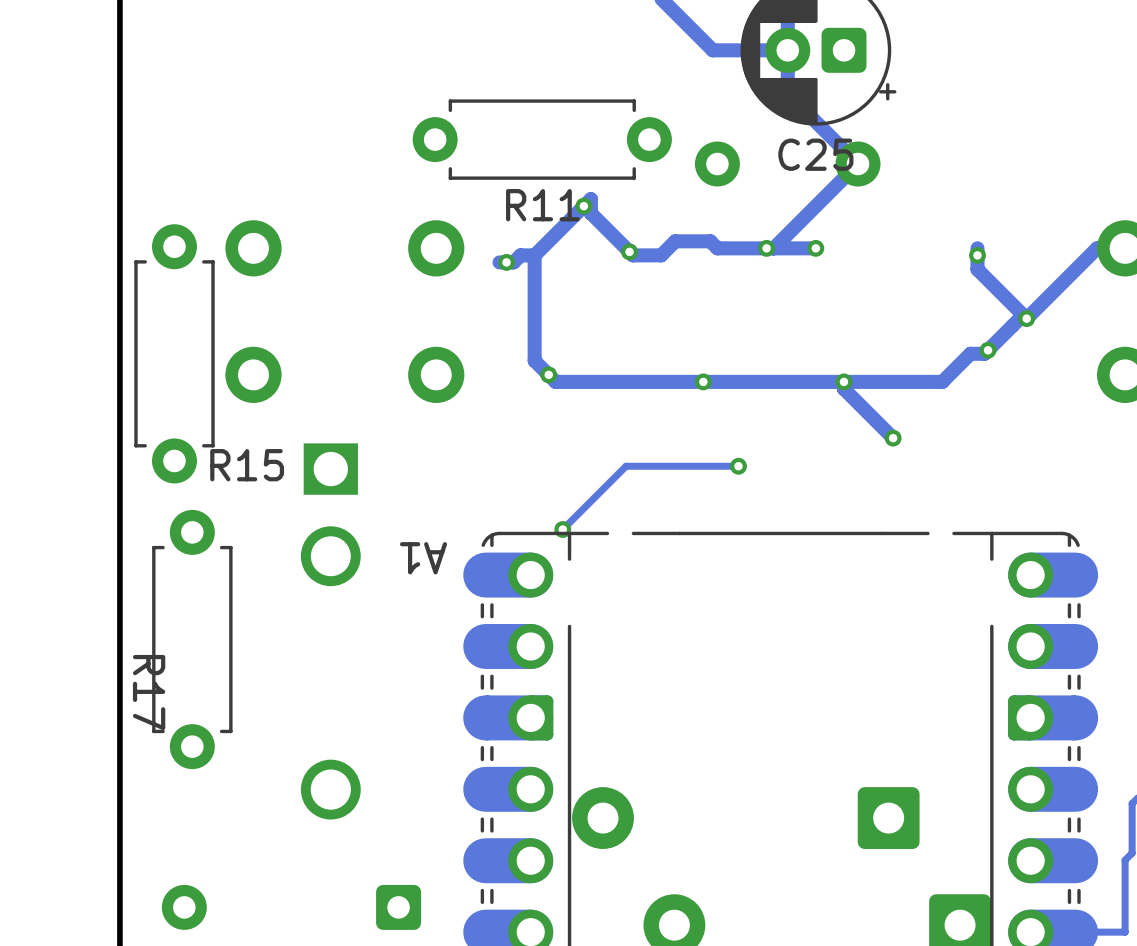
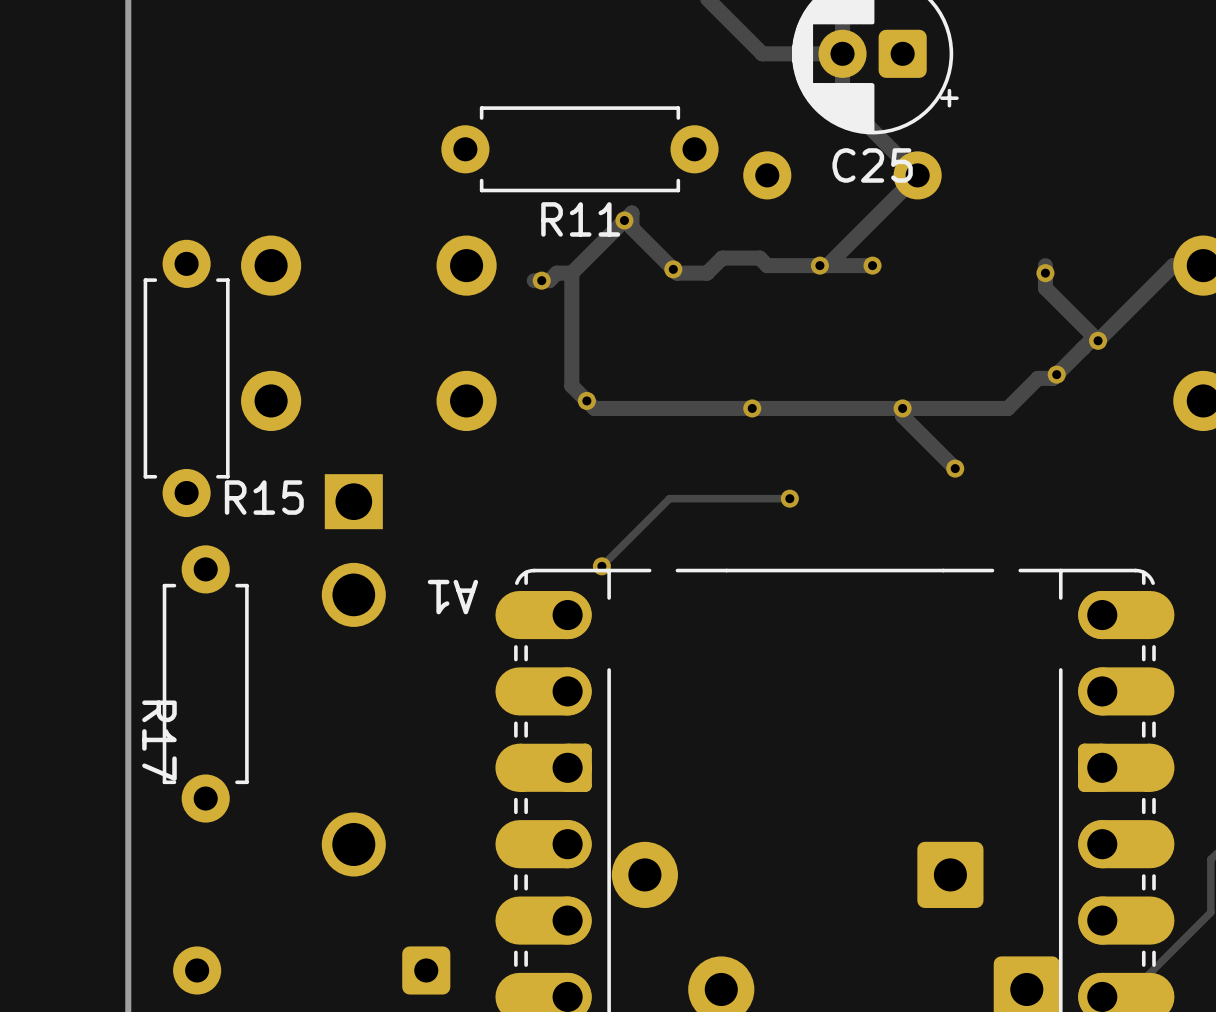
track: (1125, 860) (1125, 932) (1030, 932) -> (1203, 919) (1126, 996)

